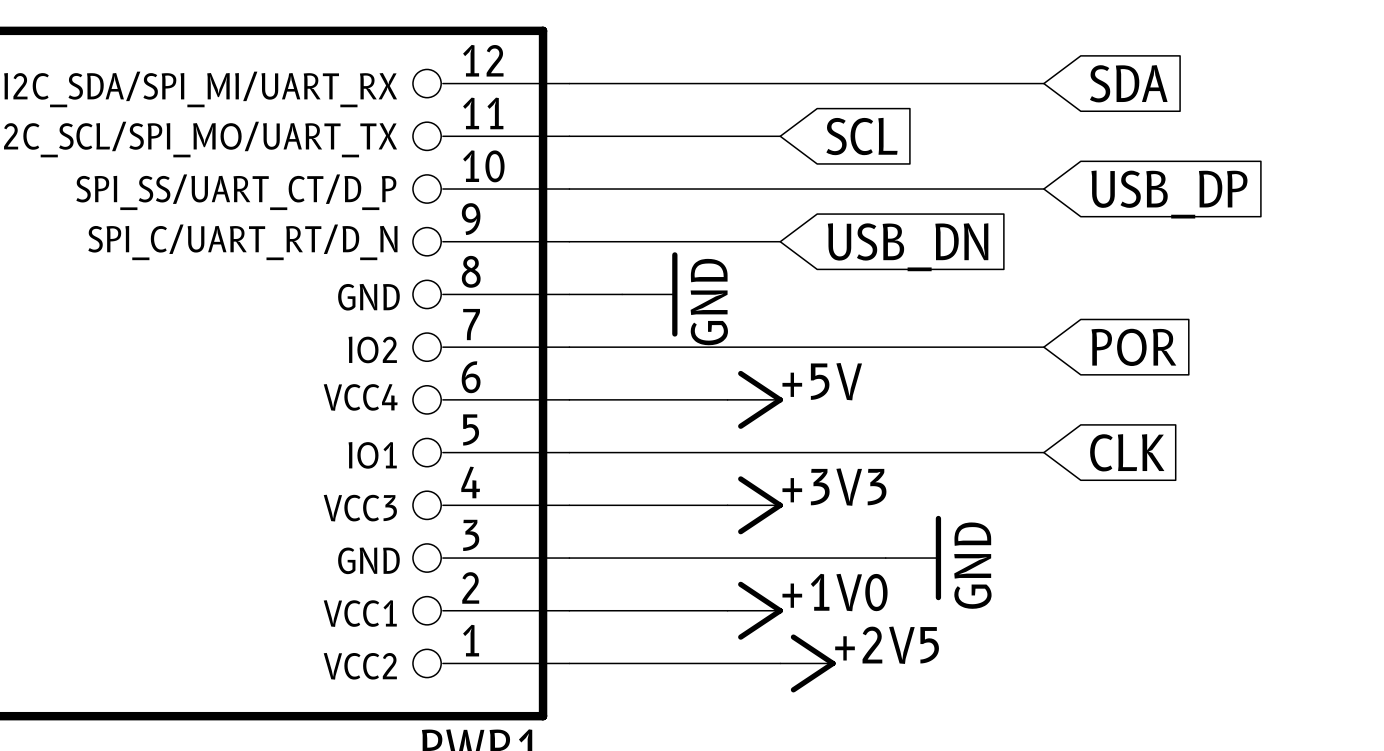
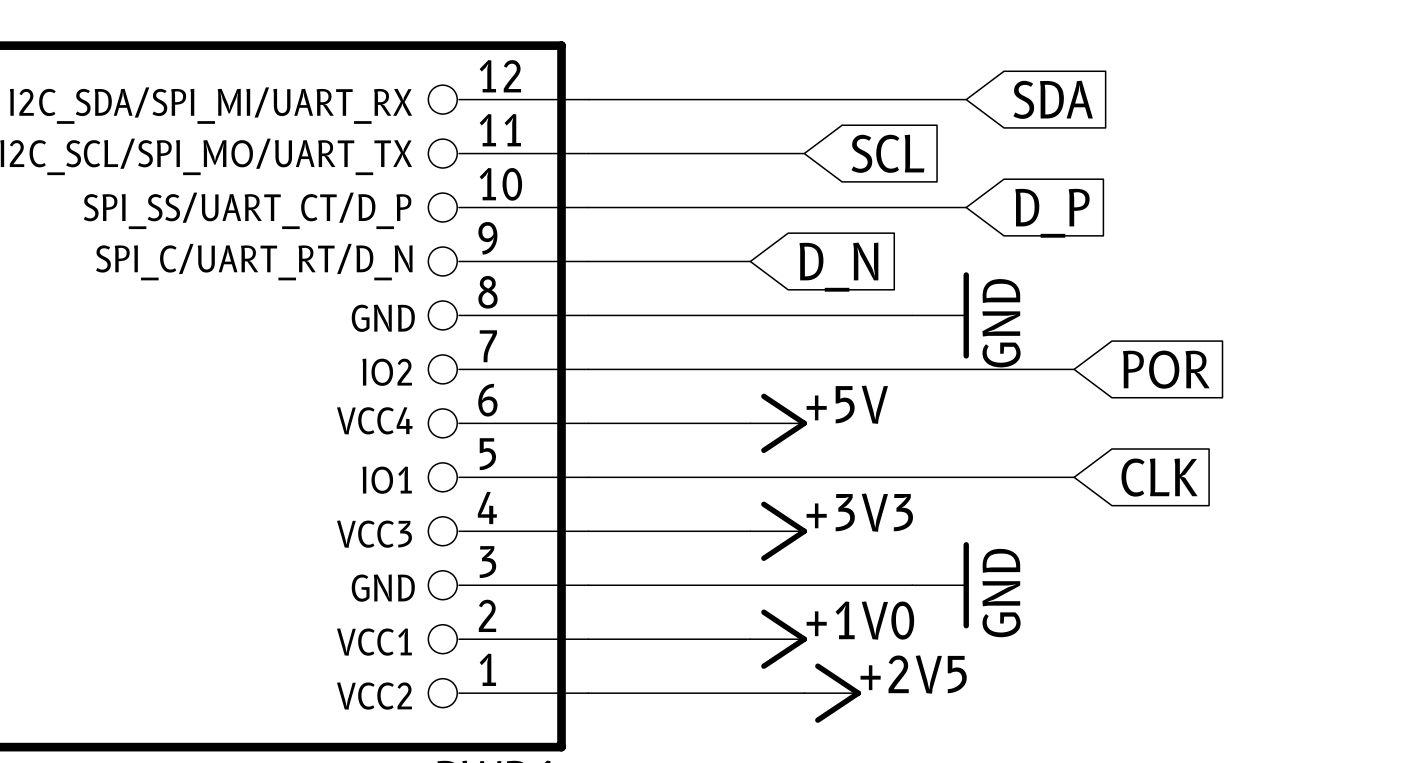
wire: (938, 83) (1043, 83) -> none
global label position: SDA (1128, 83) -> SDA (1053, 99)
wire: (938, 189) (1043, 189) -> none
global label: none -> D_P (1052, 213)
global label: USB_DP (1169, 194) -> none
wire: (727, 241) (780, 241) -> none
global label: none -> D_N (838, 267)
global label: USB_DN (908, 247) -> none
wire: none -> (642, 315) (912, 315)
power symbol position: GND (649, 294) -> GND (940, 315)

